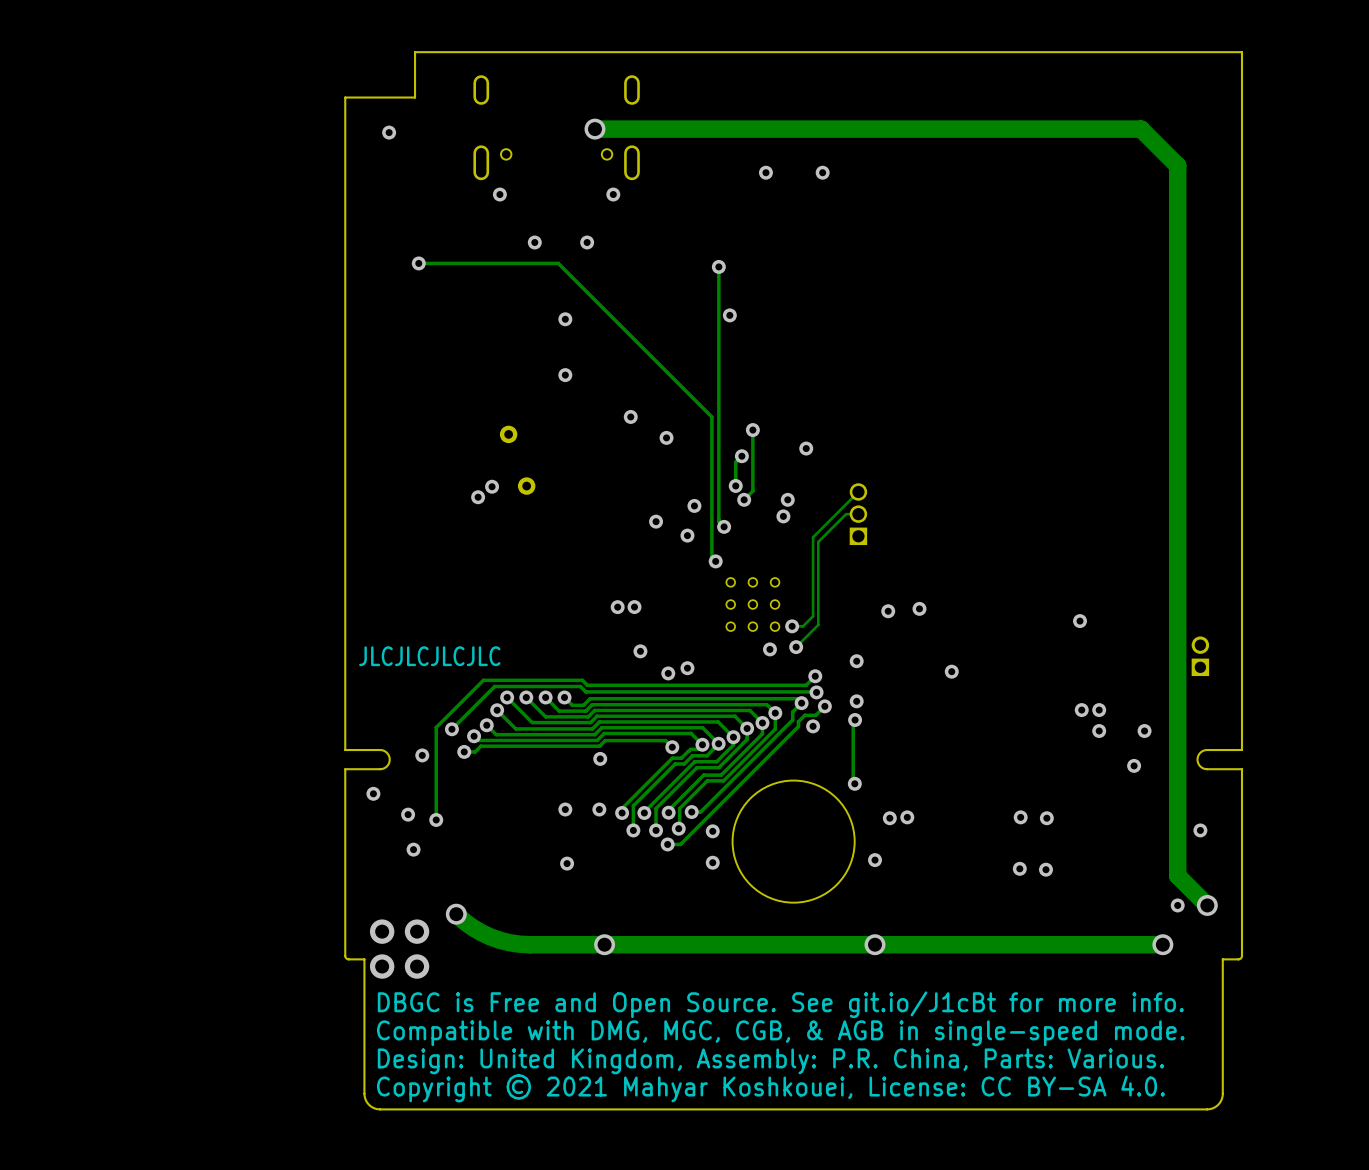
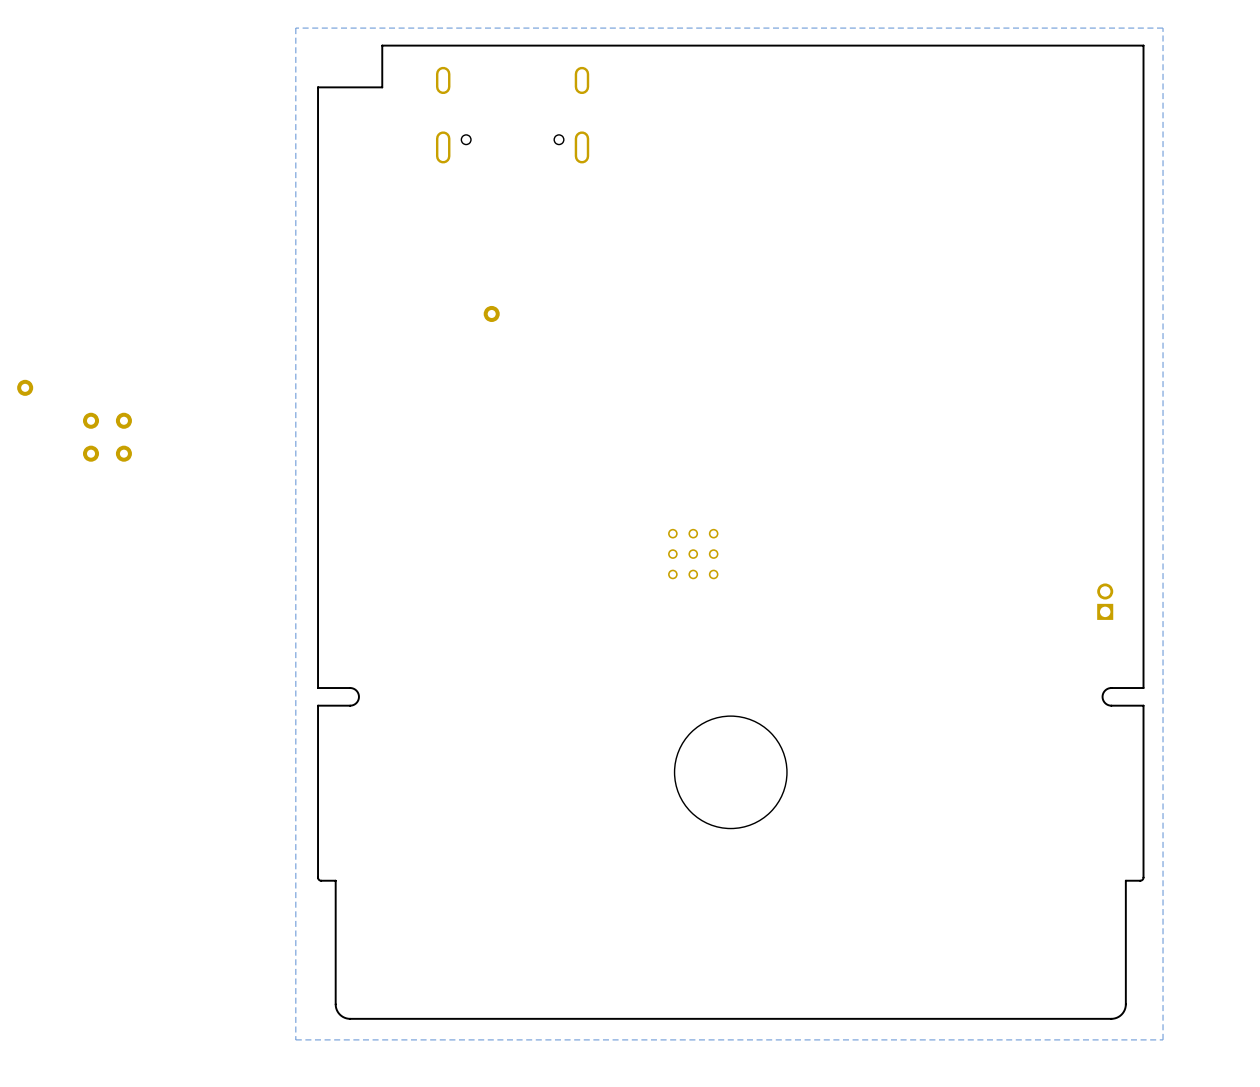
zone outline: none -> (1163, 28) (1163, 1039) (295, 1039) (295, 28) (1163, 28)
track: (594, 129) (1141, 129) (1177, 165) (1177, 875) (1207, 905) -> none
via: (594, 129) -> none
via: (389, 132) -> none
via: (765, 172) -> none
via: (822, 172) -> none
via: (499, 194) -> none
via: (613, 194) -> none
via: (534, 242) -> none
via: (587, 242) -> none
track: (418, 263) (558, 263) (711, 416) (711, 557) (715, 561) -> none
via: (418, 263) -> none
track: (718, 266) (718, 521) (724, 526) -> none
via: (718, 266) -> none
via: (729, 315) -> none
via: (565, 319) -> none
part: none -> (491, 313)
via: (565, 375) -> none
via: (630, 416) -> none
part: none -> (25, 387)
track: (752, 430) (752, 491) (744, 499) -> none
via: (752, 430) -> none
part: (508, 434) -> none
via: (666, 437) -> none
via: (806, 448) -> none
track: (741, 456) (735, 462) (735, 485) -> none
via: (741, 456) -> none
part: none -> (91, 420)
part: none -> (123, 420)
via: (735, 485) -> none
via: (492, 486) -> none
part: (526, 486) -> none
track: (858, 491) (813, 537) (813, 616) (803, 626) (792, 626) -> none
part: none -> (91, 453)
part: none -> (123, 453)
via: (478, 497) -> none
via: (744, 499) -> none
via: (787, 499) -> none
via: (694, 505) -> none
track: (858, 514) (846, 514) (818, 541) (818, 624) (796, 647) -> none
part: (858, 514) -> none
via: (783, 516) -> none
via: (656, 521) -> none
via: (724, 526) -> none
via: (687, 535) -> none
via: (715, 561) -> none
via: (617, 607) -> none
via: (634, 607) -> none
via: (919, 608) -> none
via: (888, 611) -> none
via: (1080, 621) -> none
via: (792, 626) -> none
via: (796, 647) -> none
via: (769, 649) -> none
via: (640, 651) -> none
text: JLCJLCJLCJLC (429, 656) -> none
via: (856, 661) -> none
via: (687, 668) -> none
via: (951, 671) -> none
via: (668, 673) -> none
track: (815, 676) (806, 685) (587, 685) (582, 680) (483, 680) (436, 727) (436, 819) -> none
via: (815, 676) -> none
track: (816, 692) (585, 691) (580, 686) (494, 686) (451, 729) -> none
via: (816, 692) -> none
track: (507, 697) (532, 722) (590, 722) (597, 716) (734, 716) (747, 728) (747, 739) (718, 767) (696, 767) (656, 808) (656, 830) -> none
via: (507, 697) -> none
track: (526, 697) (545, 716) (588, 716) (594, 710) (749, 710) (762, 722) (762, 733) (721, 775) (703, 775) (668, 810) (668, 812) -> none
via: (526, 697) -> none
track: (545, 697) (559, 711) (585, 711) (592, 704) (766, 704) (775, 713) (775, 729) (723, 780) (707, 780) (679, 808) (678, 828) -> none
via: (545, 697) -> none
track: (564, 697) (572, 705) (583, 705) (590, 698) (797, 698) (801, 703) (792, 712) (792, 719) (700, 812) (691, 812) -> none
via: (564, 697) -> none
via: (856, 701) -> none
via: (801, 703) -> none
track: (824, 706) (815, 715) (804, 715) (798, 721) (798, 726) (680, 844) (667, 844) -> none
via: (824, 706) -> none
track: (497, 710) (515, 728) (592, 728) (599, 721) (718, 721) (733, 737) (733, 745) (716, 761) (694, 761) (644, 813) -> none
via: (497, 710) -> none
via: (1081, 710) -> none
via: (1099, 710) -> none
via: (775, 713) -> none
track: (855, 720) (853, 721) (853, 782) (854, 783) -> none
via: (855, 720) -> none
via: (762, 722) -> none
track: (486, 725) (496, 734) (594, 734) (601, 727) (702, 727) (718, 743) (713, 748) -> none
via: (486, 725) -> none
via: (813, 726) -> none
via: (747, 728) -> none
via: (451, 729) -> none
via: (1099, 731) -> none
via: (1144, 731) -> none
track: (474, 736) (478, 740) (597, 740) (604, 733) (691, 733) (702, 744) (697, 749) (690, 749) (681, 758) (672, 758) (622, 808) (622, 813) -> none
via: (474, 736) -> none
via: (733, 737) -> none
via: (718, 743) -> none
via: (702, 744) -> none
track: (672, 747) (665, 740) (605, 740) (599, 746) (480, 746) (475, 751) (464, 751) -> none
via: (672, 747) -> none
track: (713, 749) (706, 755) (692, 755) (684, 763) (675, 763) (633, 805) (633, 830) -> none
via: (464, 751) -> none
via: (422, 755) -> none
via: (600, 758) -> none
via: (1134, 765) -> none
via: (854, 783) -> none
via: (373, 793) -> none
via: (565, 809) -> none
via: (599, 809) -> none
via: (668, 812) -> none
via: (691, 812) -> none
via: (622, 813) -> none
via: (644, 813) -> none
via: (408, 814) -> none
via: (907, 817) -> none
via: (1020, 817) -> none
via: (889, 818) -> none
via: (1046, 818) -> none
via: (436, 819) -> none
via: (678, 828) -> none
via: (633, 830) -> none
via: (656, 830) -> none
via: (1200, 830) -> none
via: (712, 831) -> none
via: (667, 844) -> none
via: (413, 849) -> none
via: (875, 860) -> none
via: (712, 862) -> none
via: (567, 863) -> none
via: (1019, 868) -> none
via: (1045, 869) -> none
via: (1177, 905) -> none
via: (1207, 905) -> none
track: (456, 914) (472, 927) (490, 936) (509, 942) (530, 944) (1162, 944) (604, 944) -> none
via: (456, 914) -> none
via: (382, 931) -> none
via: (417, 931) -> none
via: (604, 944) -> none
via: (875, 944) -> none
via: (1162, 944) -> none
via: (382, 966) -> none
via: (417, 966) -> none
text: DBGC is Free and Open Source. See git.io/J1cBt for more info. (780, 1004) -> none
text: Compatible with DMG, MGC, CGB, & AGB in single-speed mode. (780, 1033) -> none
text: Design: United Kingdom, Assembly: P.R. China, Parts: Various. (770, 1061) -> none
text: Copyright © 2021 Mahyar Koshkouei, License: CC BY-SA 4.0. (770, 1088) -> none

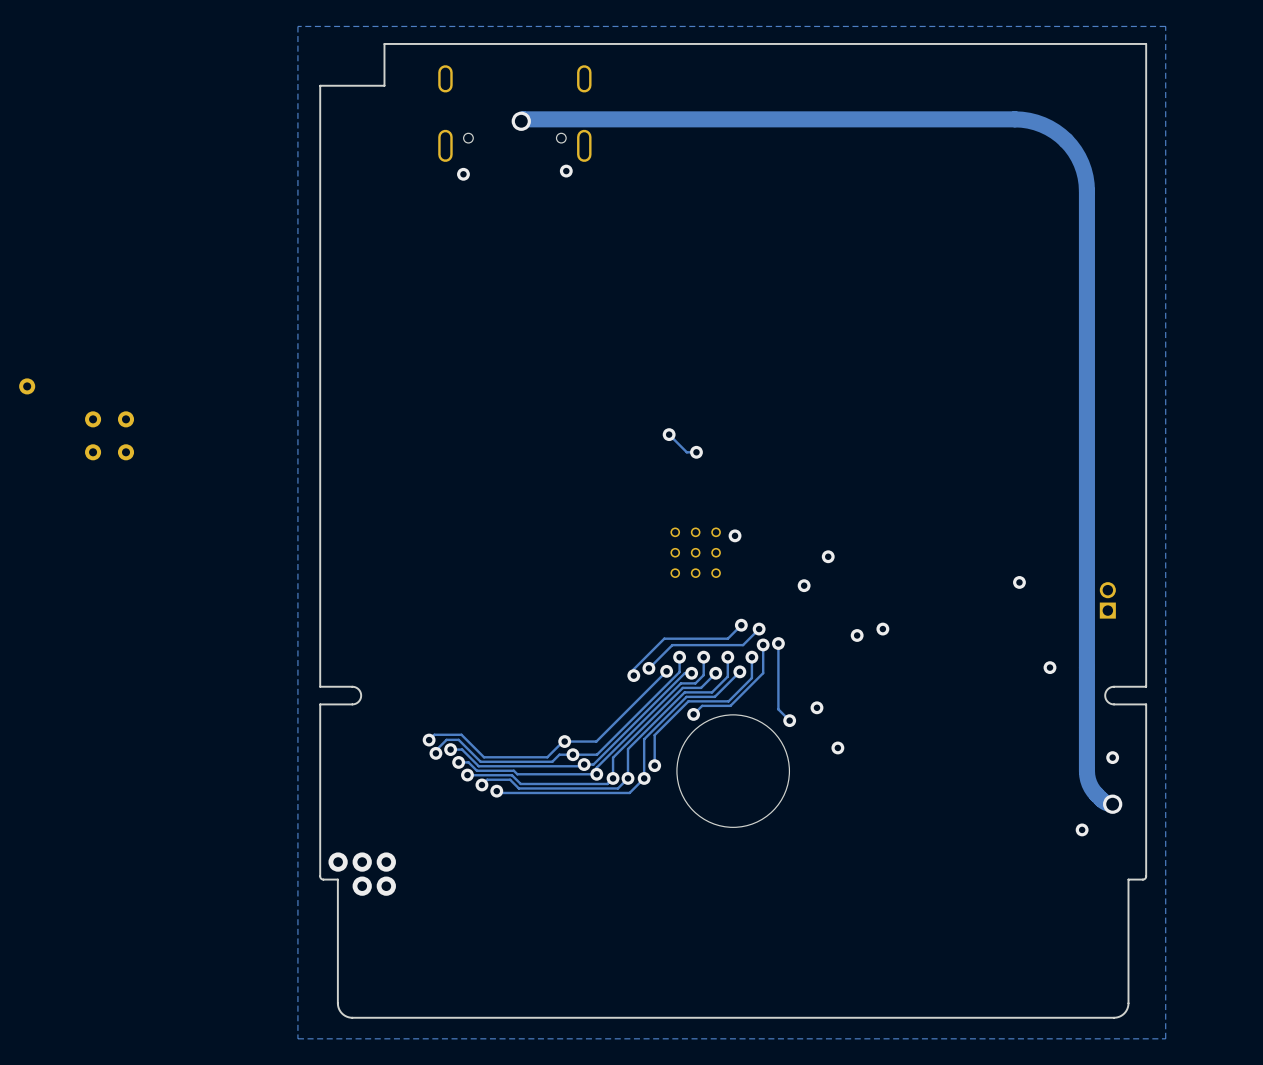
track: none -> (521, 121) (523, 119) (1014, 119) (1042, 124) (1055, 131) (1070, 145) (1081, 163) (1086, 190) (1086, 771) (1088, 779) (1093, 791) (1103, 801) (1112, 804)
via: none -> (521, 121)
via: none -> (566, 171)
via: none -> (463, 174)
part: (491, 313) -> none
track: none -> (669, 434) (686, 452) (696, 452)
via: none -> (669, 434)
via: none -> (696, 452)
via: none -> (735, 535)
via: none -> (828, 556)
via: none -> (1019, 582)
via: none -> (804, 585)
track: none -> (741, 625) (727, 638) (664, 638) (633, 669) (633, 675)
via: none -> (741, 625)
track: none -> (759, 629) (743, 645) (672, 645) (649, 668)
via: none -> (759, 629)
via: none -> (882, 629)
via: none -> (857, 635)
track: none -> (778, 643) (778, 709) (789, 720)
via: none -> (778, 643)
track: none -> (763, 644) (763, 673) (730, 705) (702, 705) (693, 714)
via: none -> (763, 644)
track: none -> (679, 657) (679, 672) (596, 754) (559, 754) (552, 761) (480, 761) (458, 739) (446, 739) (435, 750) (435, 753)
via: none -> (679, 657)
track: none -> (703, 657) (703, 675) (695, 683) (680, 683) (596, 767) (596, 774) (517, 774) (513, 770) (476, 770) (468, 762) (458, 762)
via: none -> (703, 657)
track: none -> (727, 657) (727, 676) (712, 692) (684, 692) (627, 749) (627, 778) (617, 788) (518, 788) (510, 779) (487, 779) (481, 784)
via: none -> (727, 657)
track: none -> (751, 657) (751, 678) (728, 701) (688, 701) (654, 735) (654, 765)
via: none -> (751, 657)
via: none -> (1049, 667)
via: none -> (648, 668)
track: none -> (666, 671) (596, 741) (563, 741) (547, 757) (484, 757) (461, 734) (434, 734) (429, 740)
via: none -> (666, 671)
track: none -> (739, 671) (714, 696) (686, 696) (644, 739) (644, 778) (629, 792) (498, 792) (496, 791)
via: none -> (739, 671)
track: none -> (691, 673) (684, 673) (593, 764) (582, 766) (478, 766) (462, 749) (450, 749)
via: none -> (691, 673)
track: none -> (715, 673) (701, 687) (682, 687) (613, 757) (613, 778) (607, 783) (520, 783) (512, 775) (467, 775)
via: none -> (715, 673)
via: none -> (633, 675)
via: none -> (816, 707)
via: none -> (693, 714)
via: none -> (789, 720)
via: none -> (429, 740)
via: none -> (564, 741)
via: none -> (837, 747)
via: none -> (450, 749)
via: none -> (435, 753)
via: none -> (572, 754)
via: none -> (1112, 757)
via: none -> (458, 762)
via: none -> (584, 764)
via: none -> (654, 765)
via: none -> (596, 774)
via: none -> (467, 775)
via: none -> (613, 778)
via: none -> (627, 778)
via: none -> (644, 778)
via: none -> (481, 784)
via: none -> (496, 791)
via: none -> (1112, 804)
via: none -> (1082, 829)
via: none -> (338, 862)
via: none -> (362, 862)
via: none -> (386, 862)
via: none -> (362, 886)
via: none -> (386, 886)

